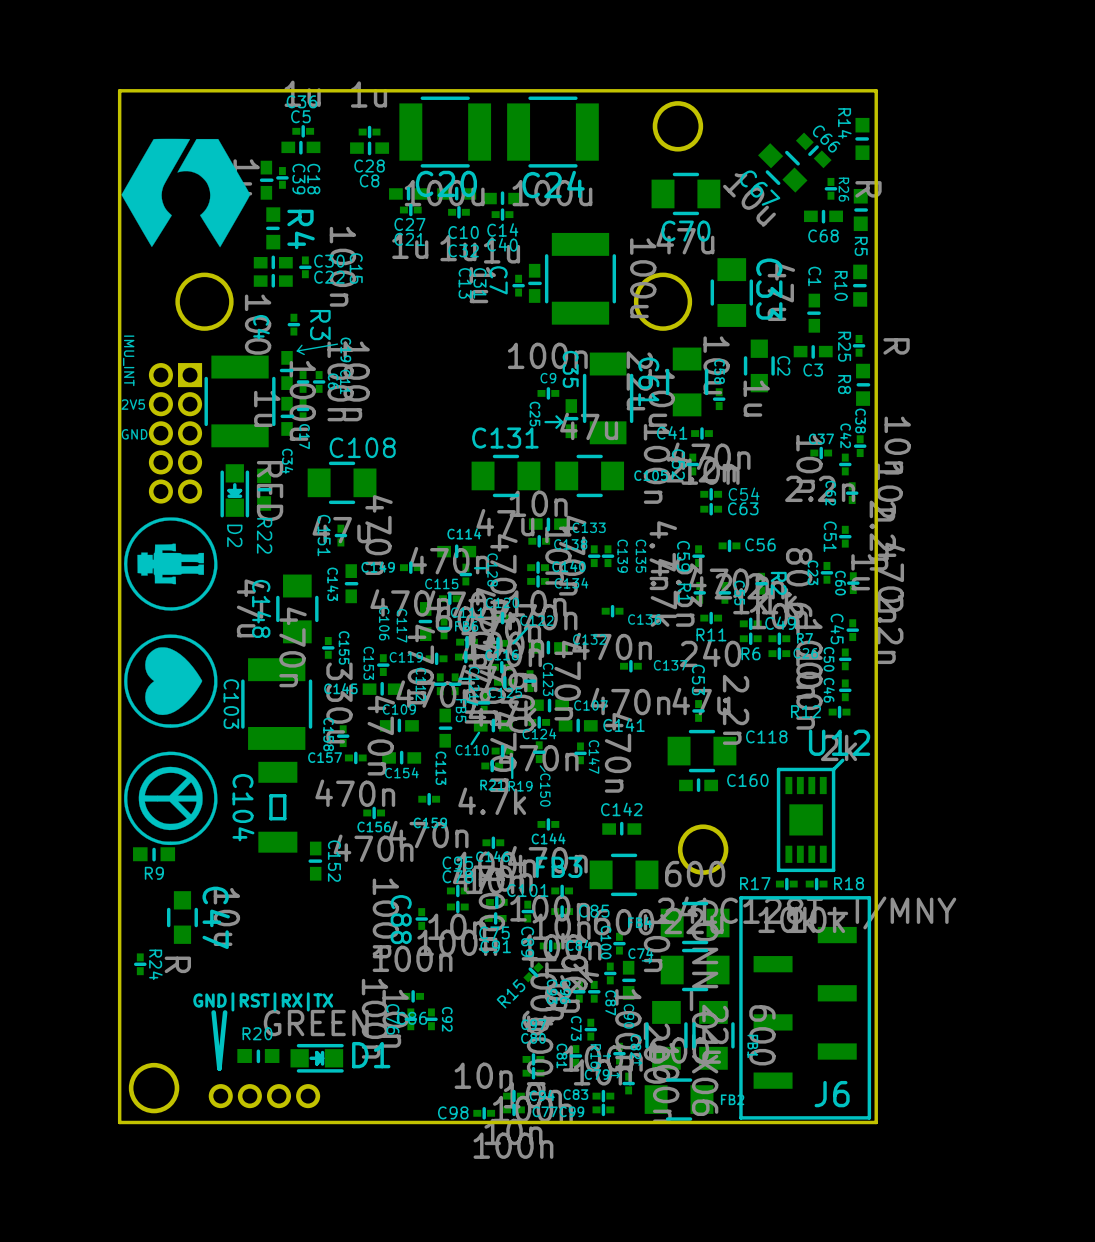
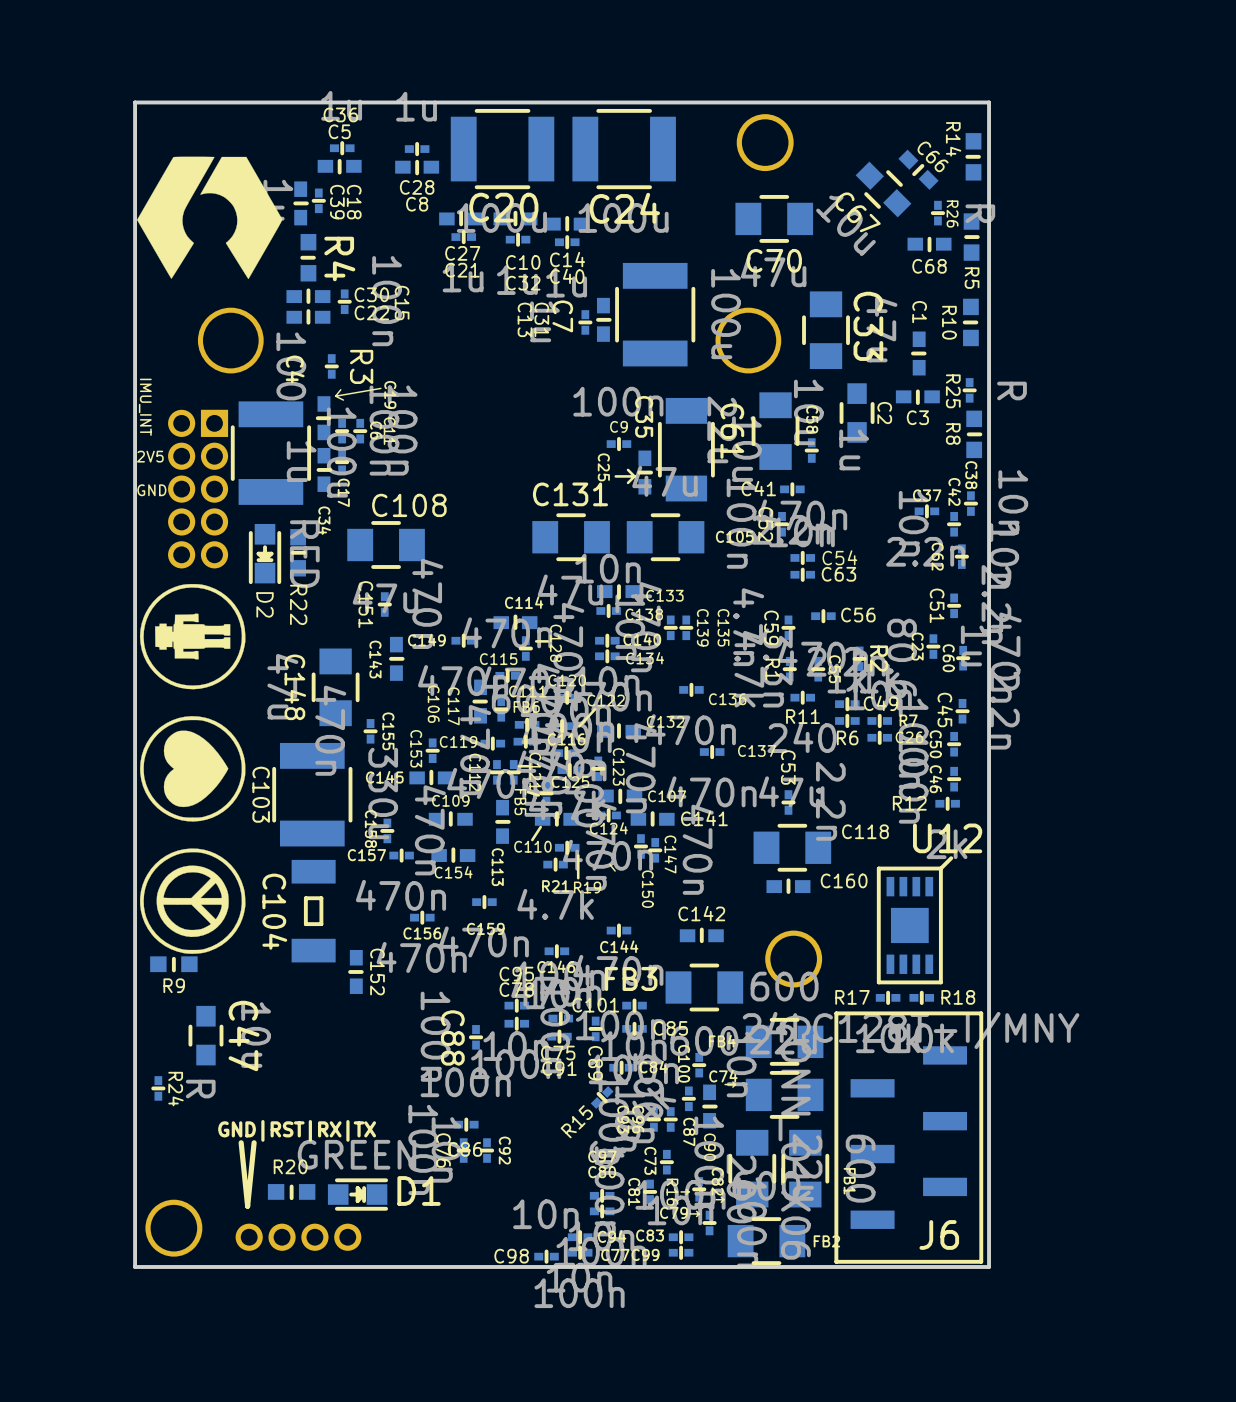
C150 position: (539, 752) -> (640, 846)

